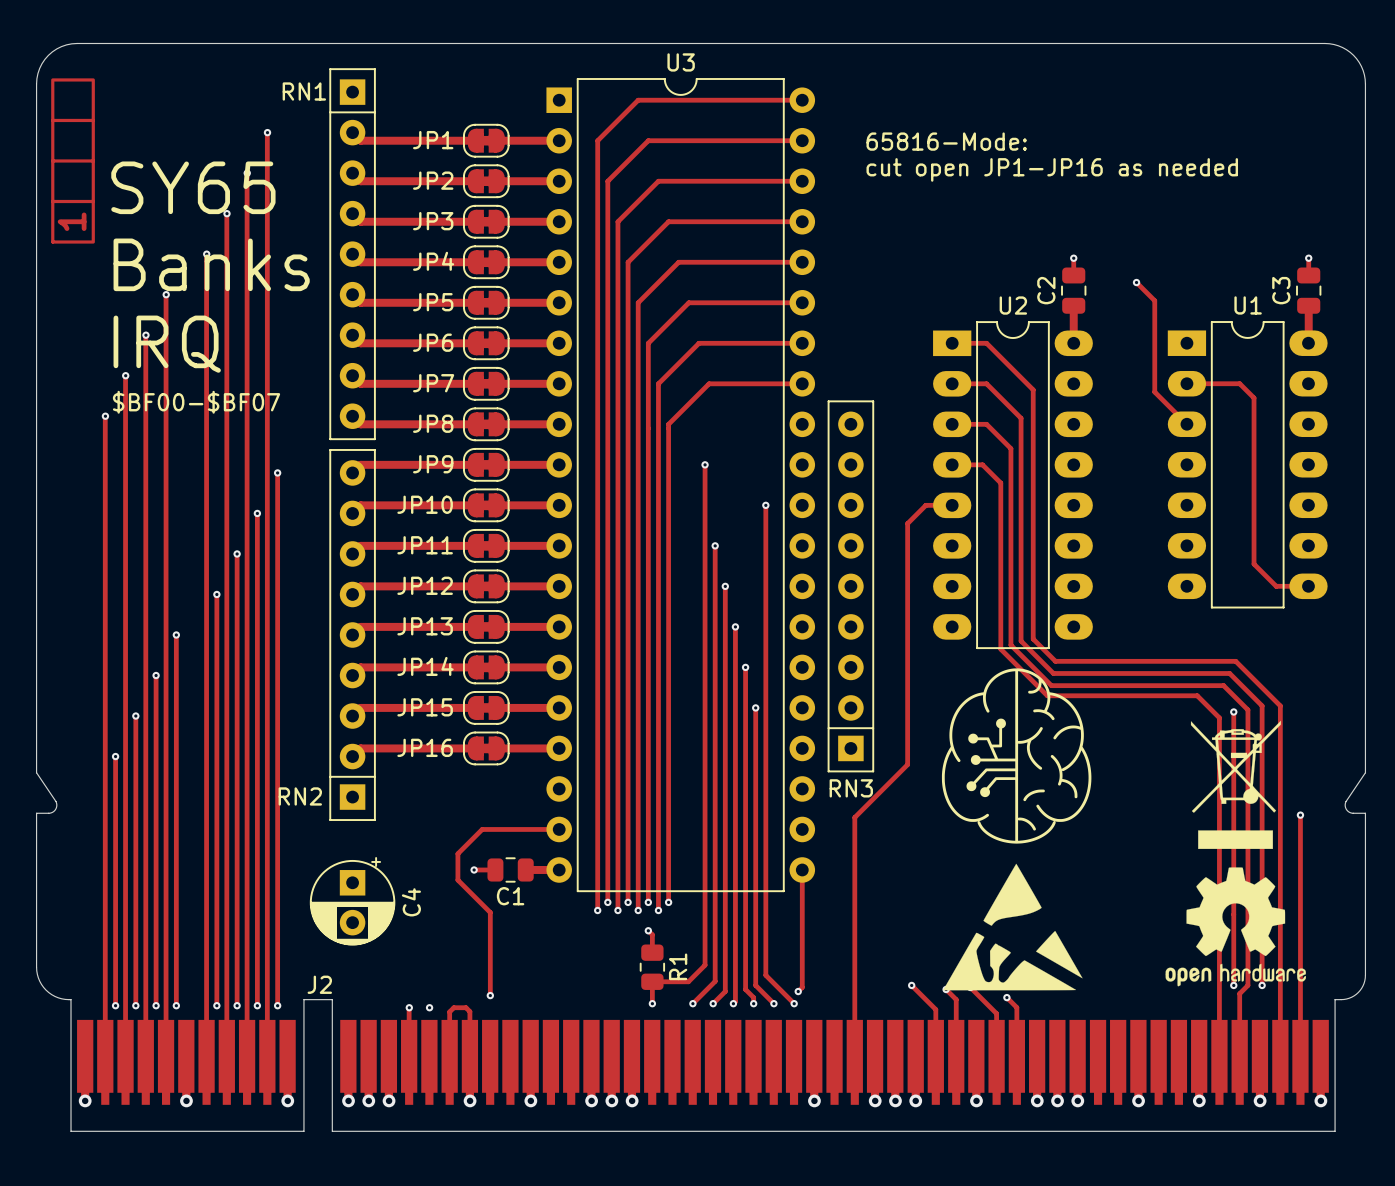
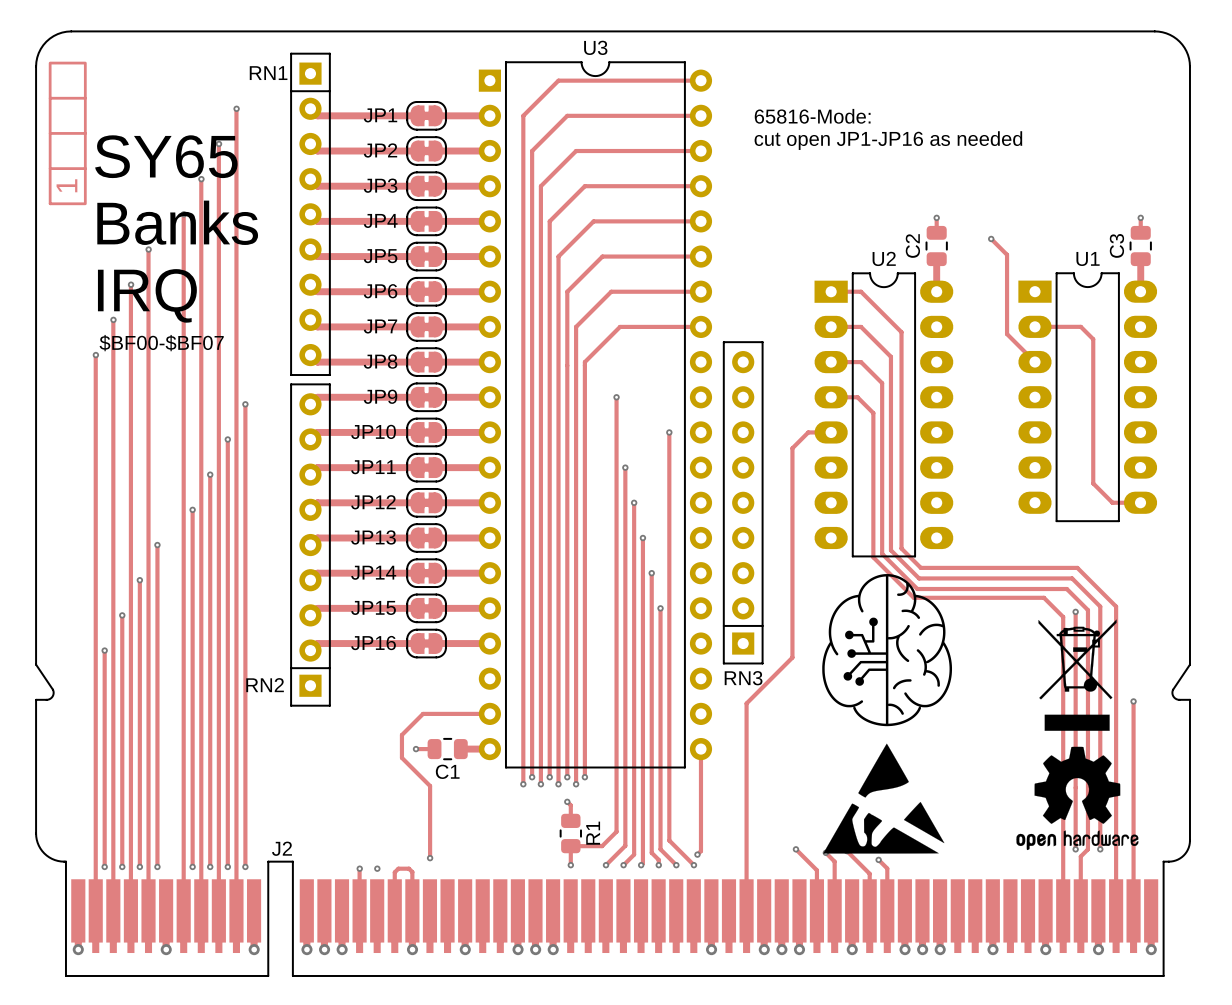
C4: (352, 901) -> none

